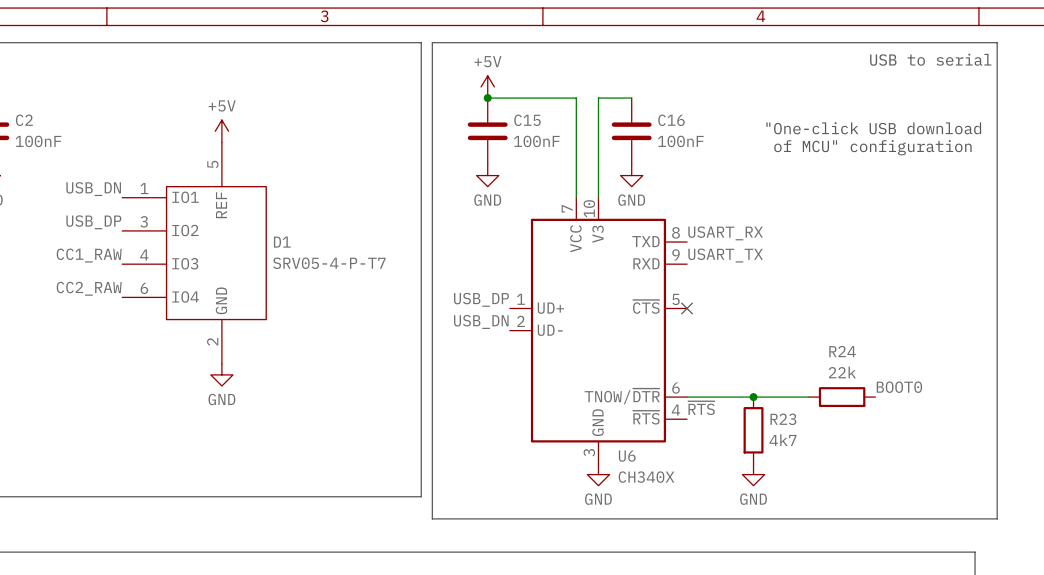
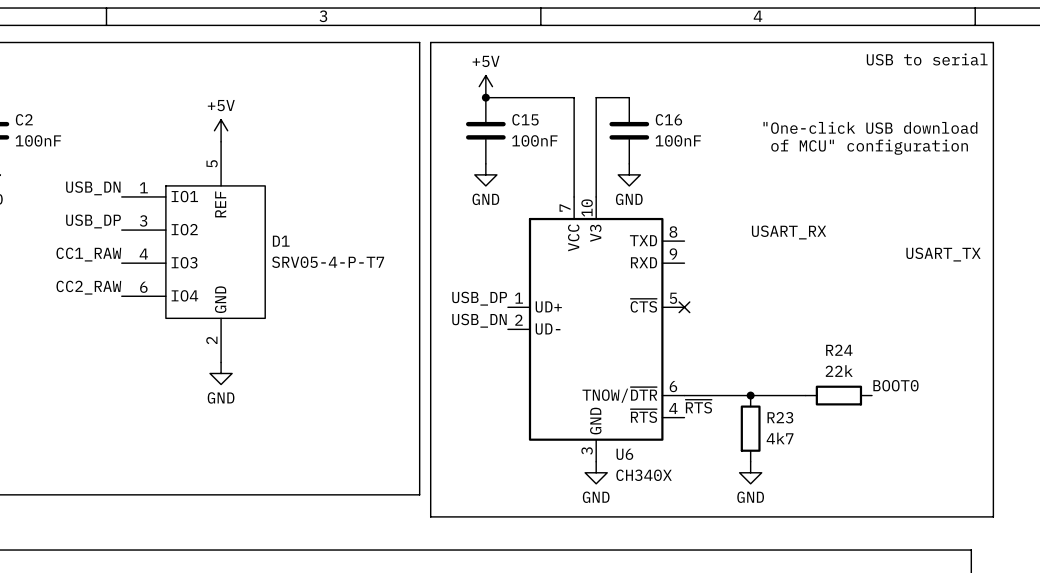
label position: USART_RX (725, 233) -> USART_RX (789, 232)
label: USART_TX (725, 255) -> none
label: none -> USART_TX (943, 254)

